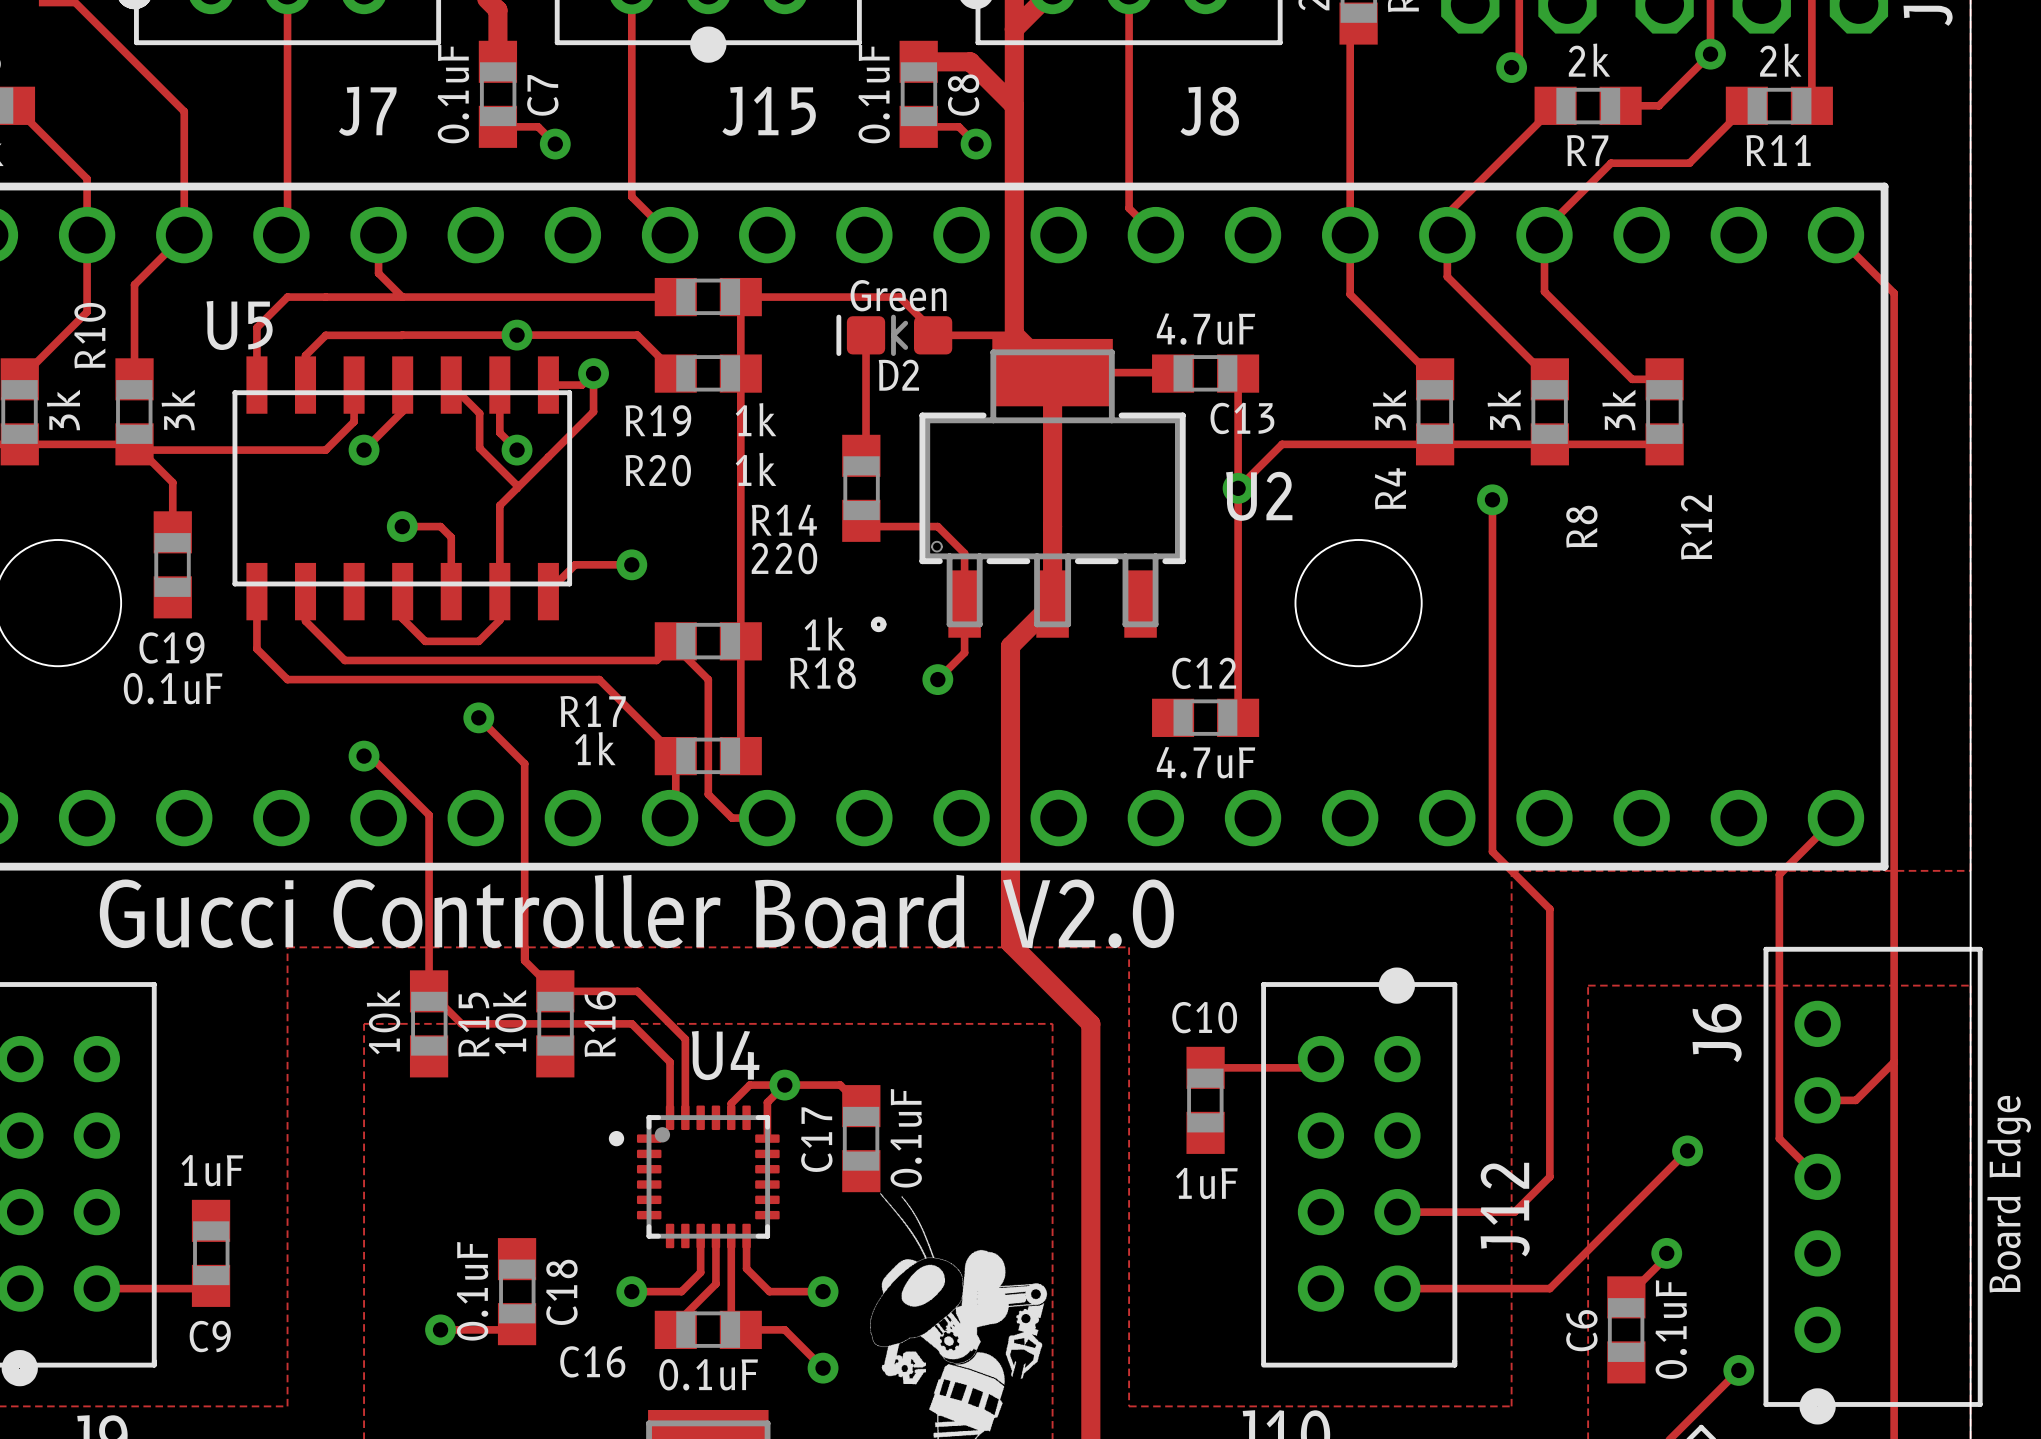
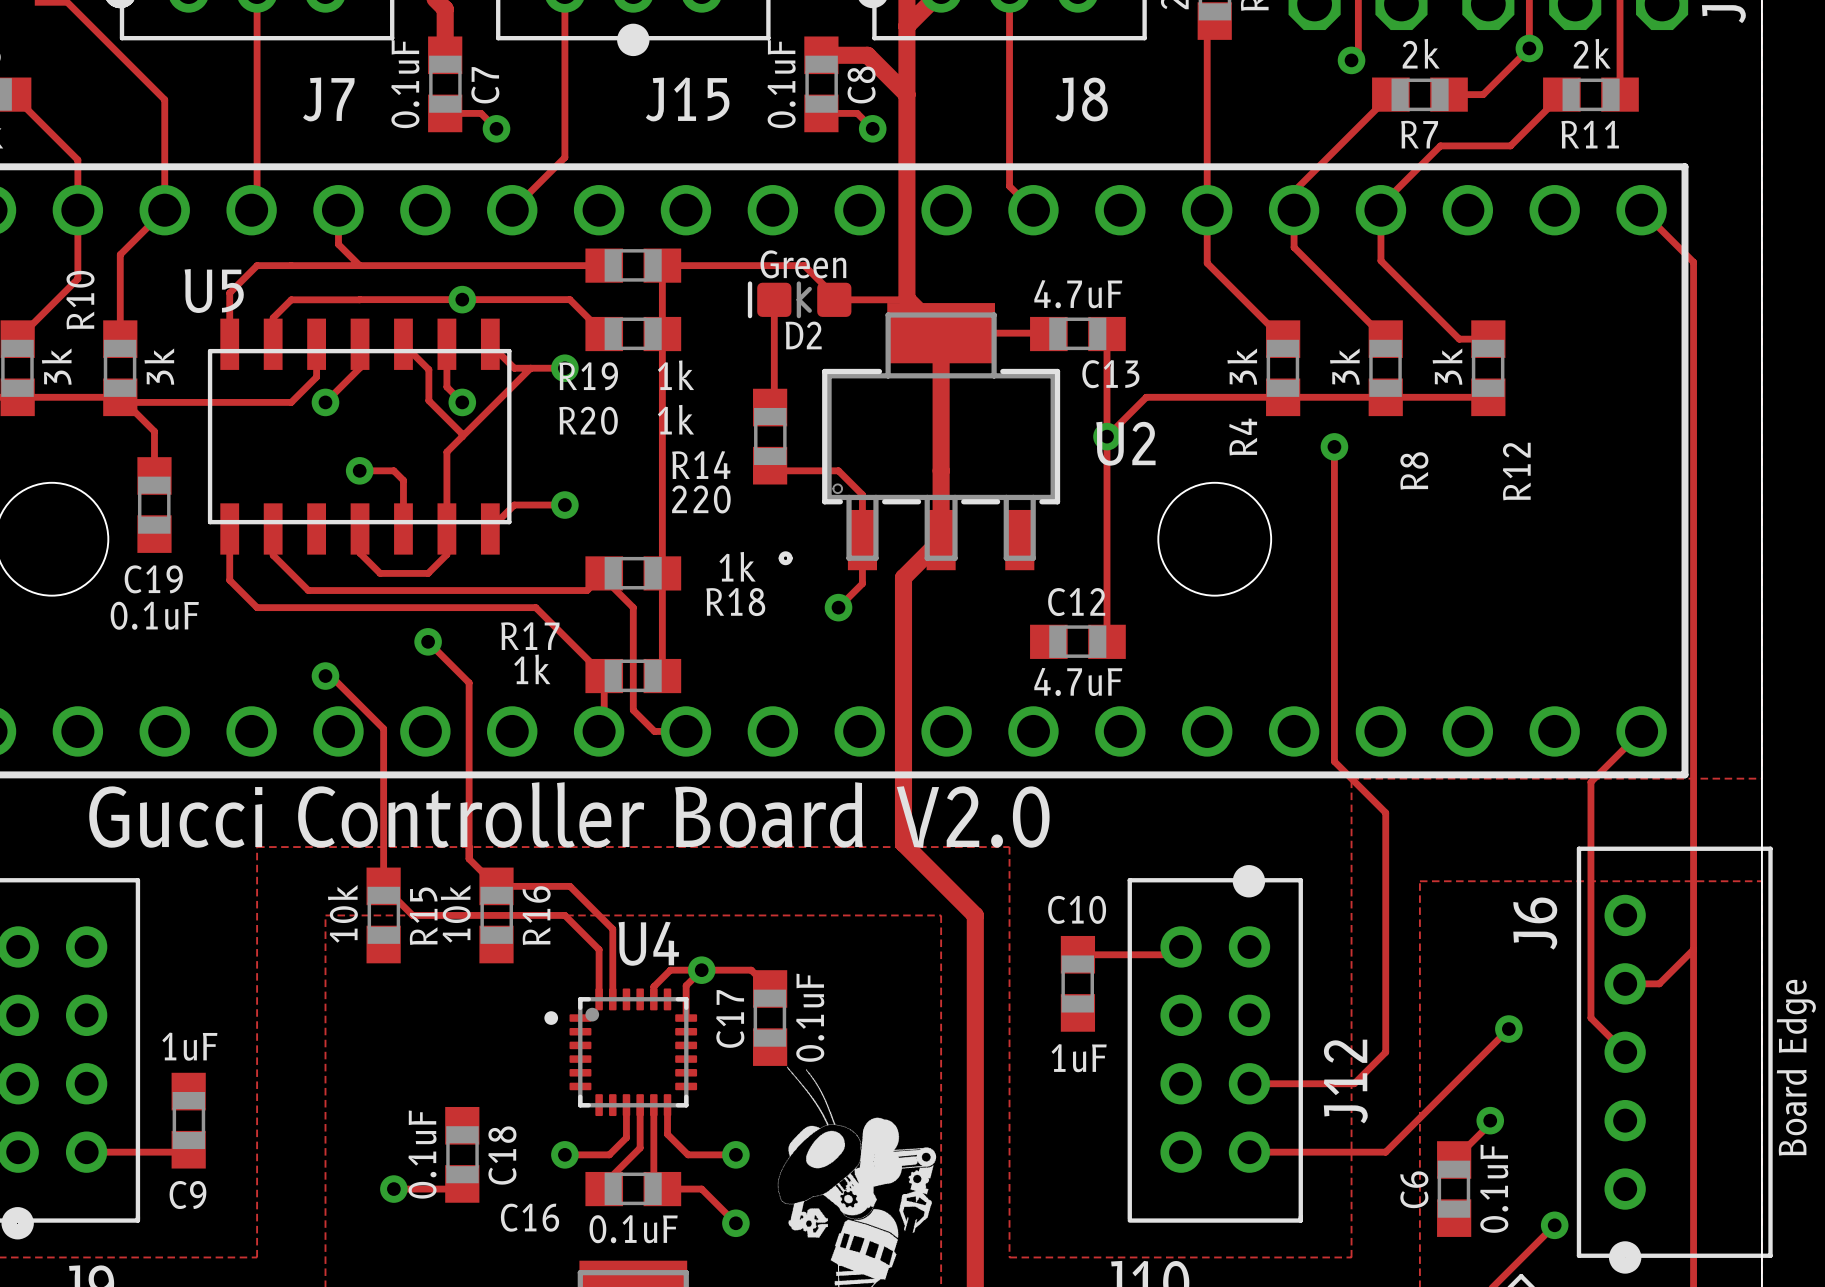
track: (631, 176) (631, 196) (670, 235) -> (564, 157) (512, 210)
via position: (593, 373) -> (564, 368)
track: (548, 385) (582, 385) (593, 373) (593, 411) -> (490, 344) (514, 368) (564, 368)

